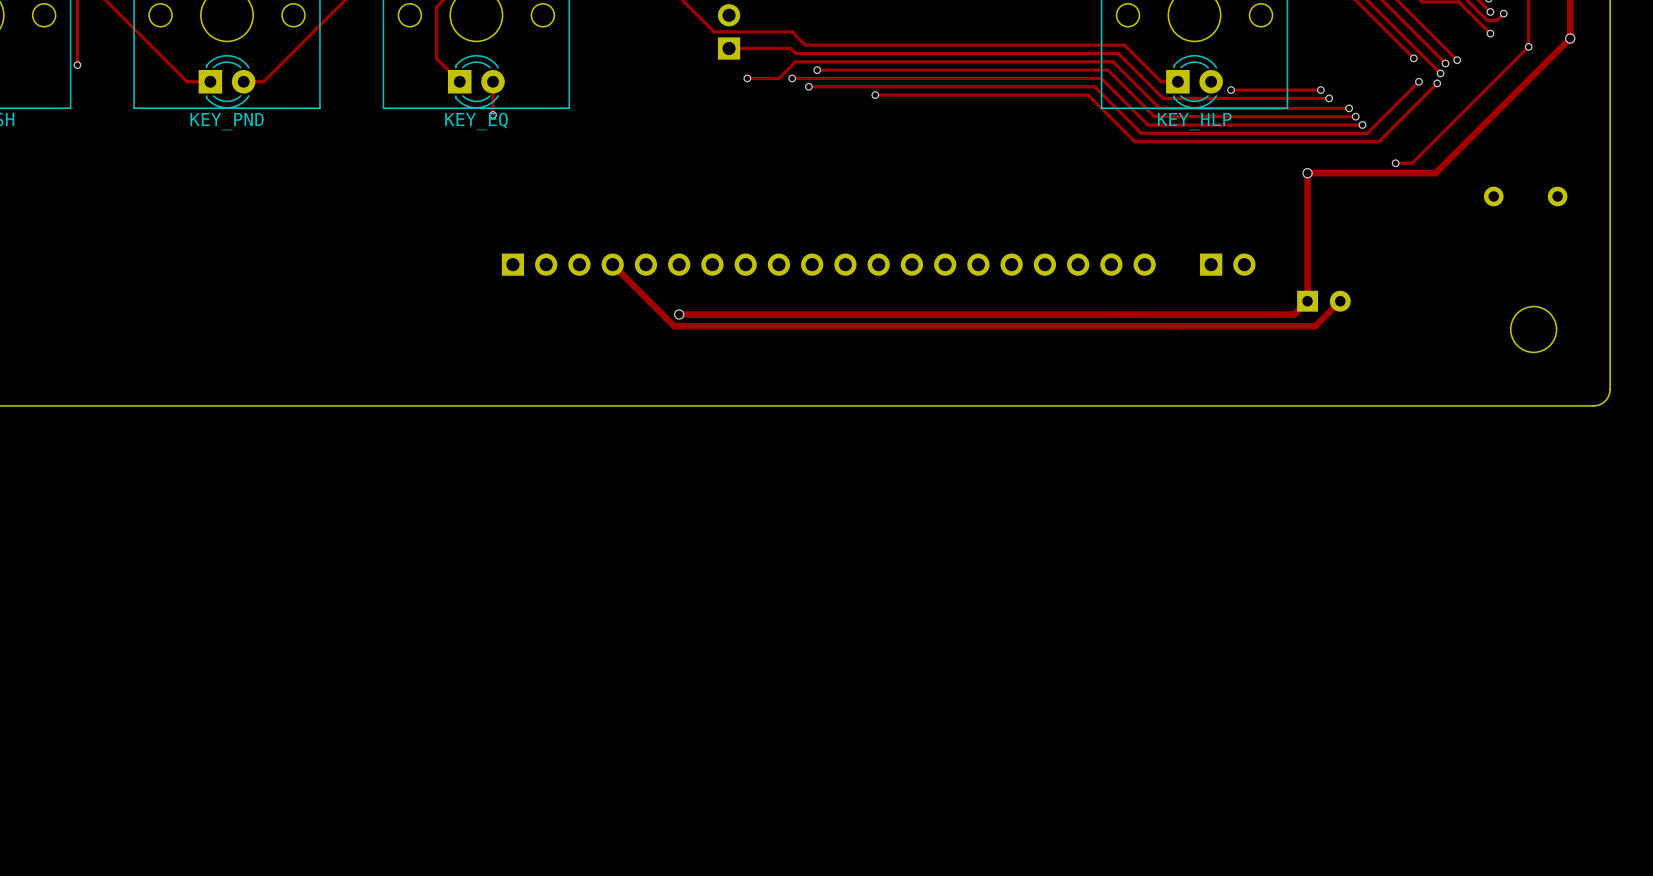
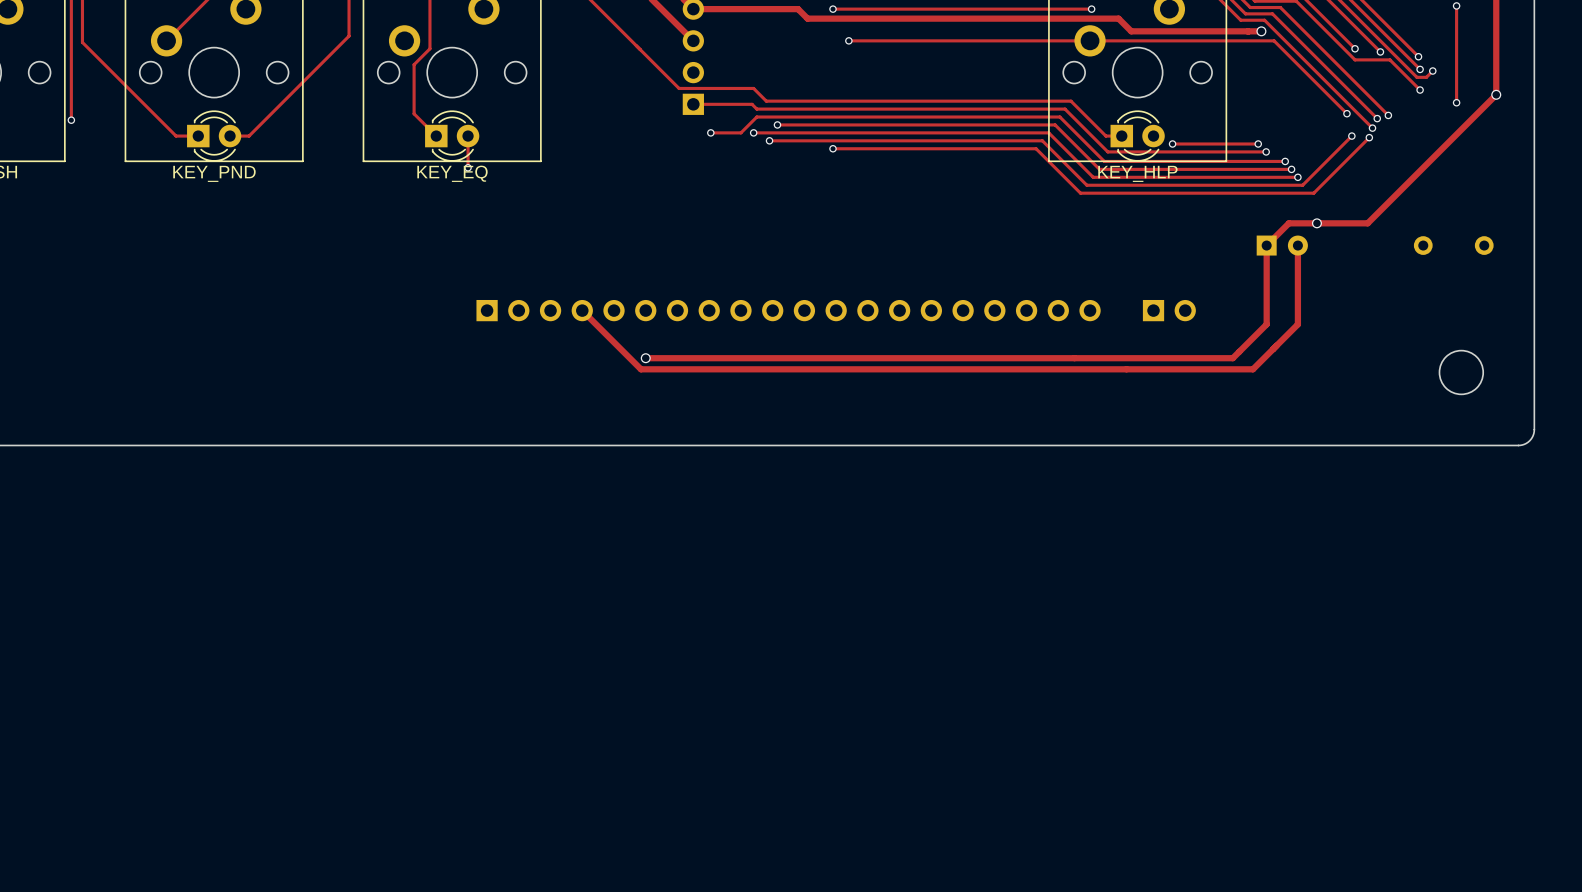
track: (1528, 46) (1412, 163) (1395, 163) -> none
via: (1395, 163) -> none
via position: (1307, 173) -> (1316, 223)
track: (1352, 173) (1307, 173) (1307, 301) -> (1288, 223) (1266, 245) (1266, 324) (1245, 345)
track: none -> (1297, 245) (1297, 324) (1276, 345)
part position: (1323, 301) -> (1282, 245)

